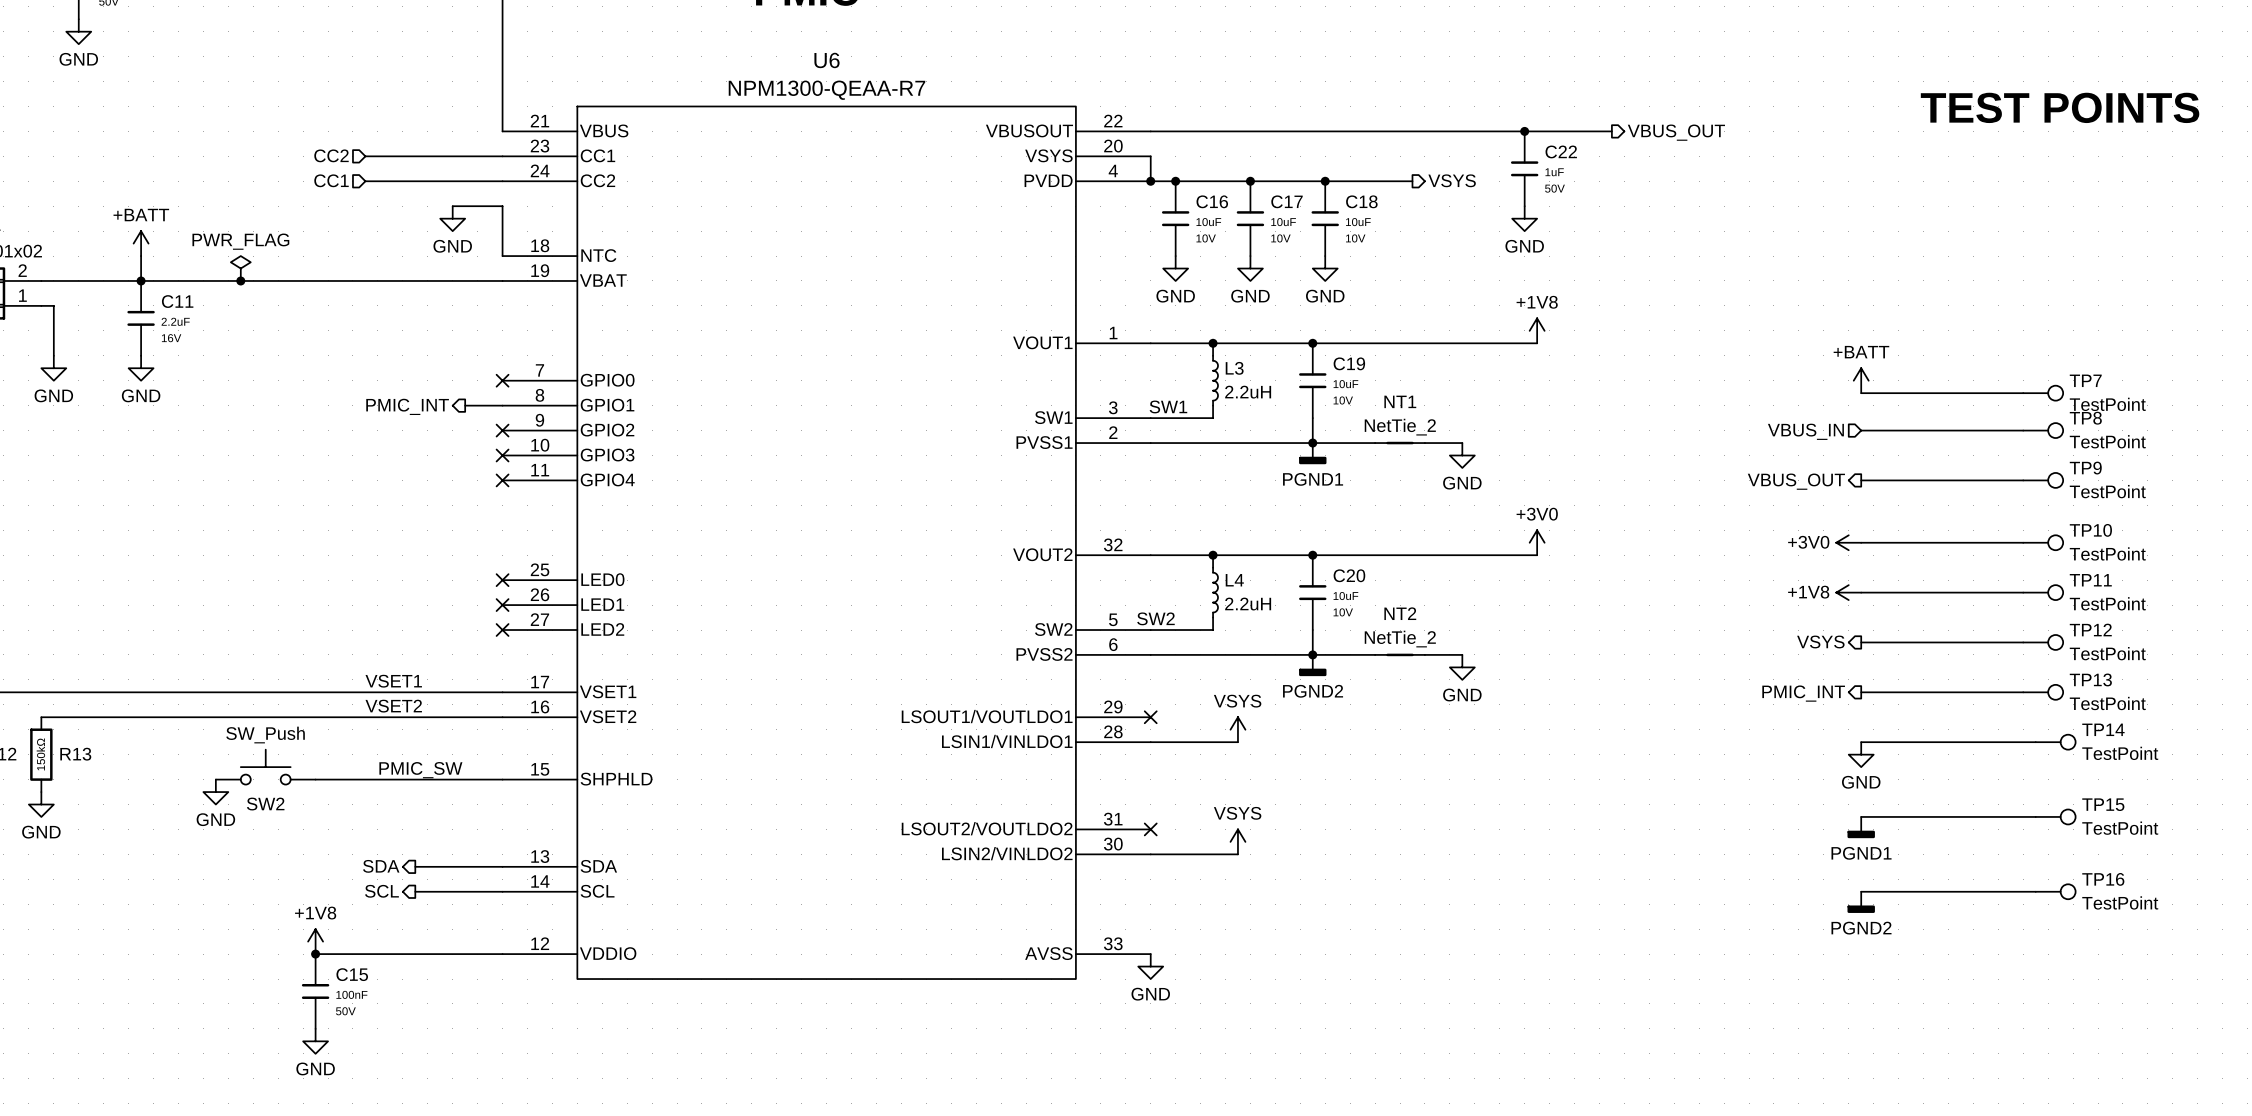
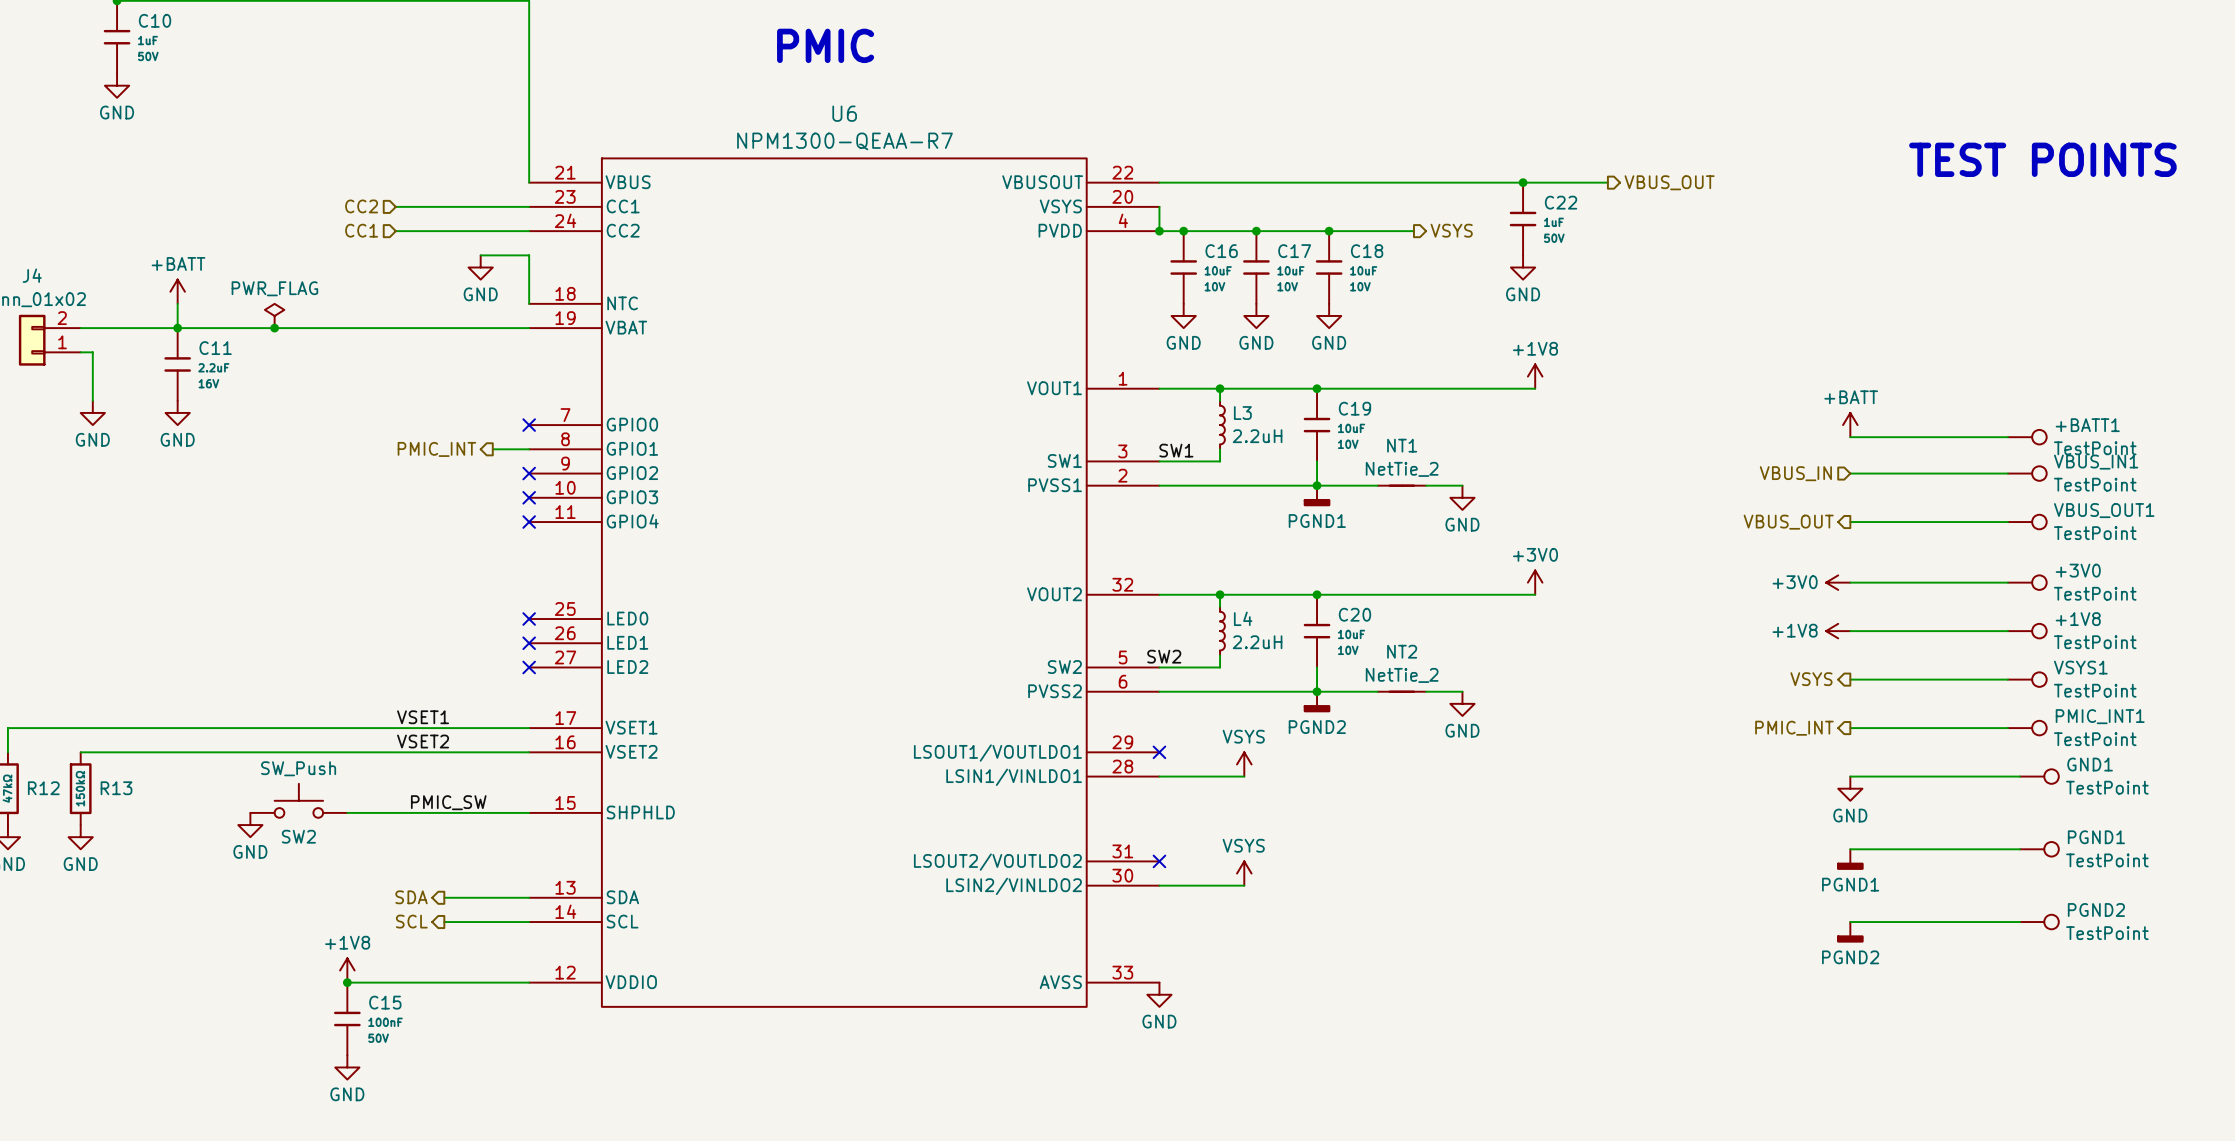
TP7 name: TP7 (2085, 380) -> +BATT1 (2087, 425)
TP8 name: TP8 (2085, 418) -> VBUS_IN1 (2096, 462)
TP9 name: TP9 (2085, 468) -> VBUS_OUT1 (2104, 510)
TP10 name: TP10 (2090, 530) -> +3V0 (2078, 570)
TP11 name: TP11 (2090, 580) -> +1V8 (2078, 619)
TP12 name: TP12 (2090, 630) -> VSYS1 (2080, 667)
TP13 name: TP13 (2090, 679) -> PMIC_INT1 (2100, 716)
TP14 name: TP14 (2103, 729) -> GND1 (2090, 764)
TP15 name: TP15 (2103, 804) -> PGND1 (2096, 837)
TP16 name: TP16 (2103, 879) -> PGND2 (2096, 909)

